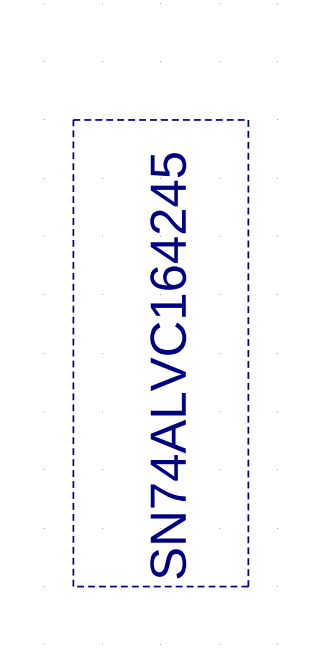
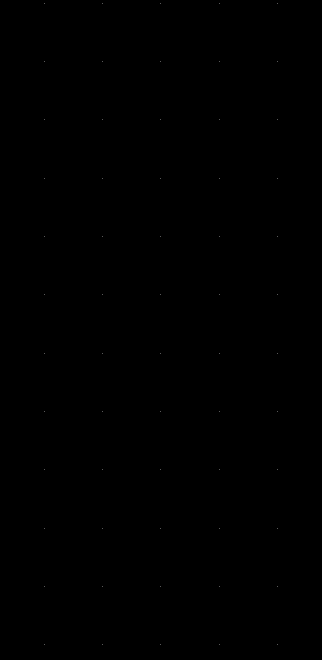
line: (73, 119) (248, 119) (248, 586) (73, 586) (73, 119) -> none
text: SN74ALVC164245 (168, 365) -> none

